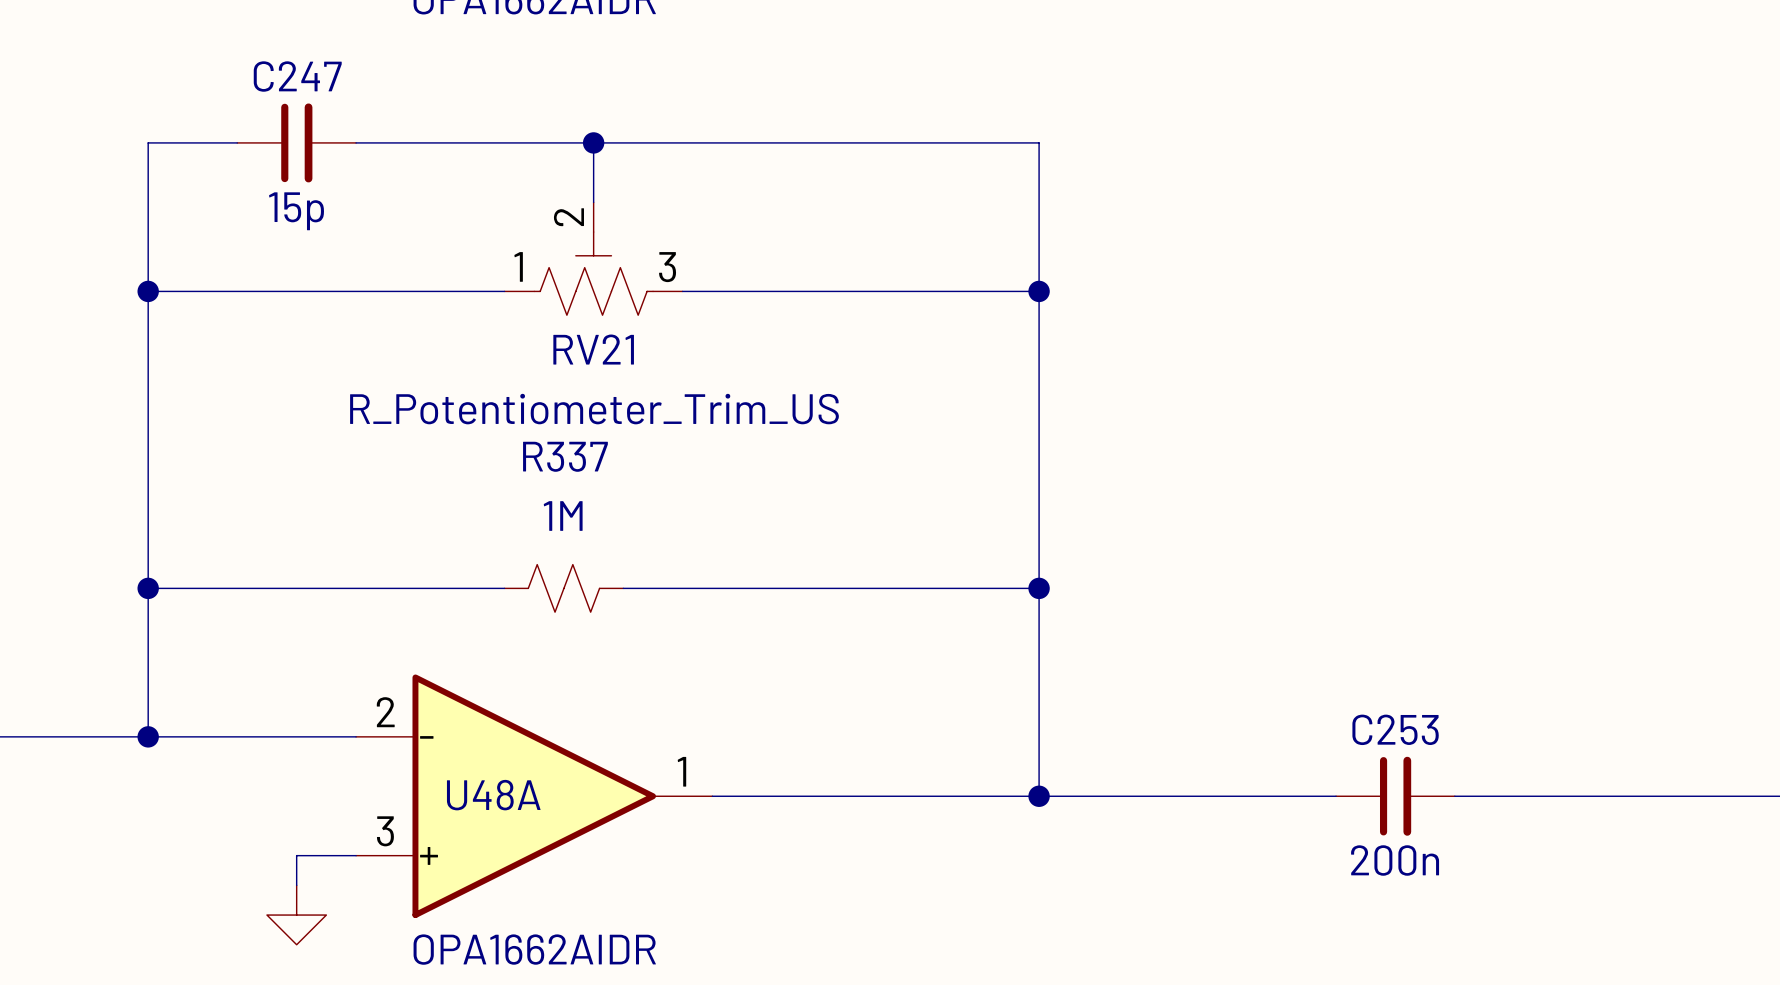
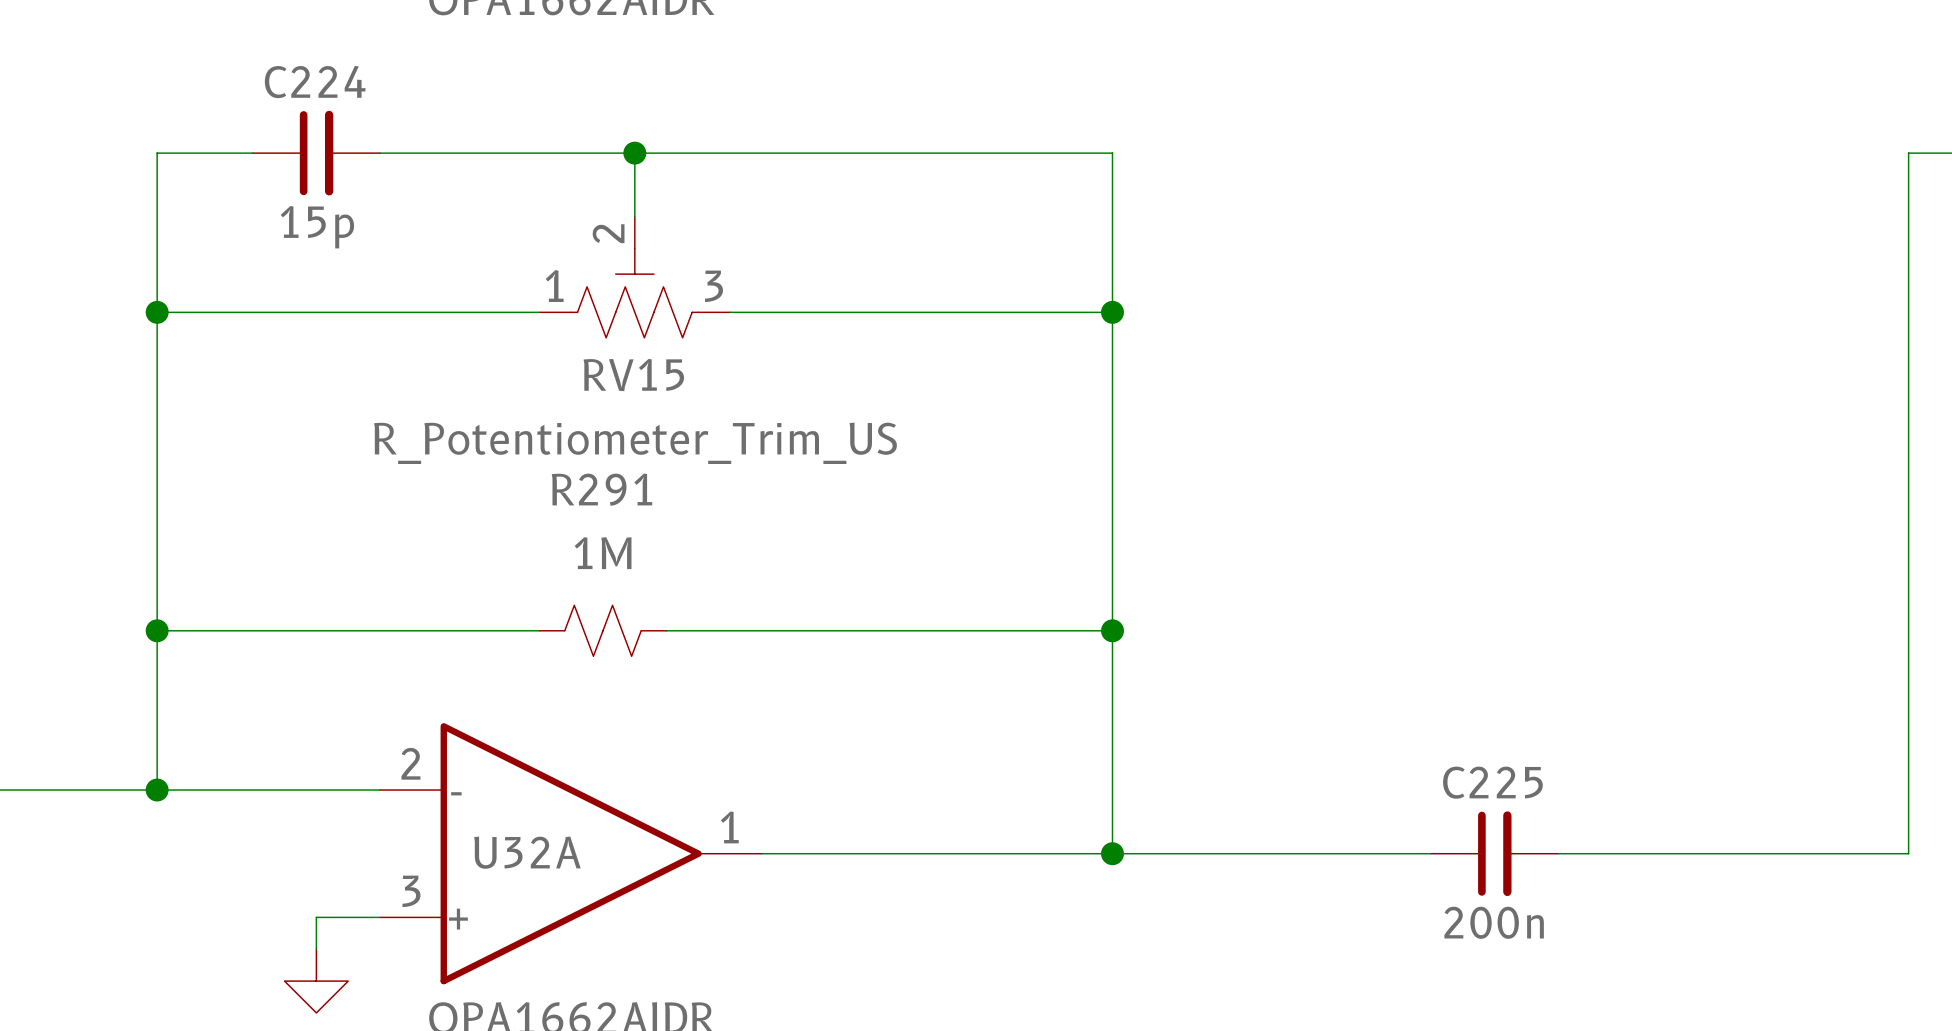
C247 name: C247 (297, 76) -> C224 (315, 82)
RV21 name: RV21 (593, 349) -> RV15 (633, 375)
R337 name: R337 (565, 456) -> R291 (601, 489)
C253 name: C253 (1395, 729) -> C225 (1492, 782)
U48A name: U48A (493, 795) -> U32A (527, 852)

